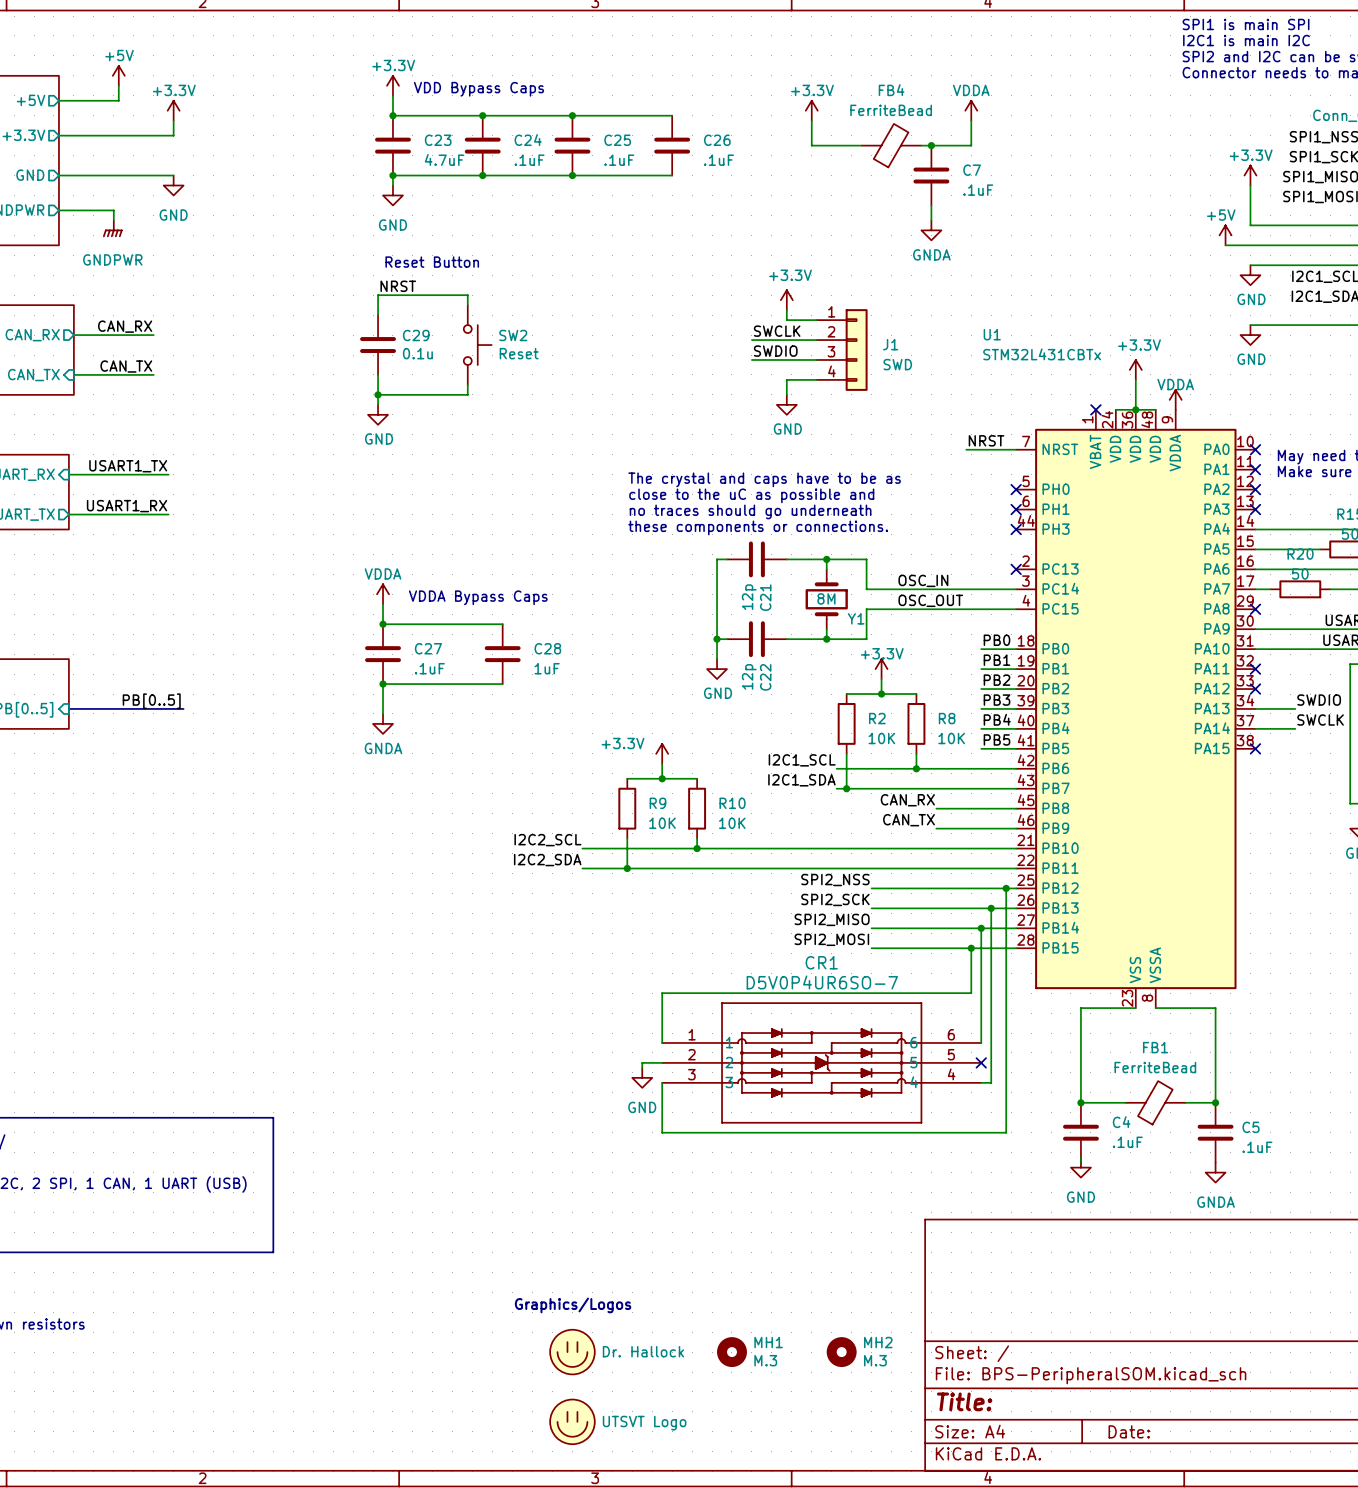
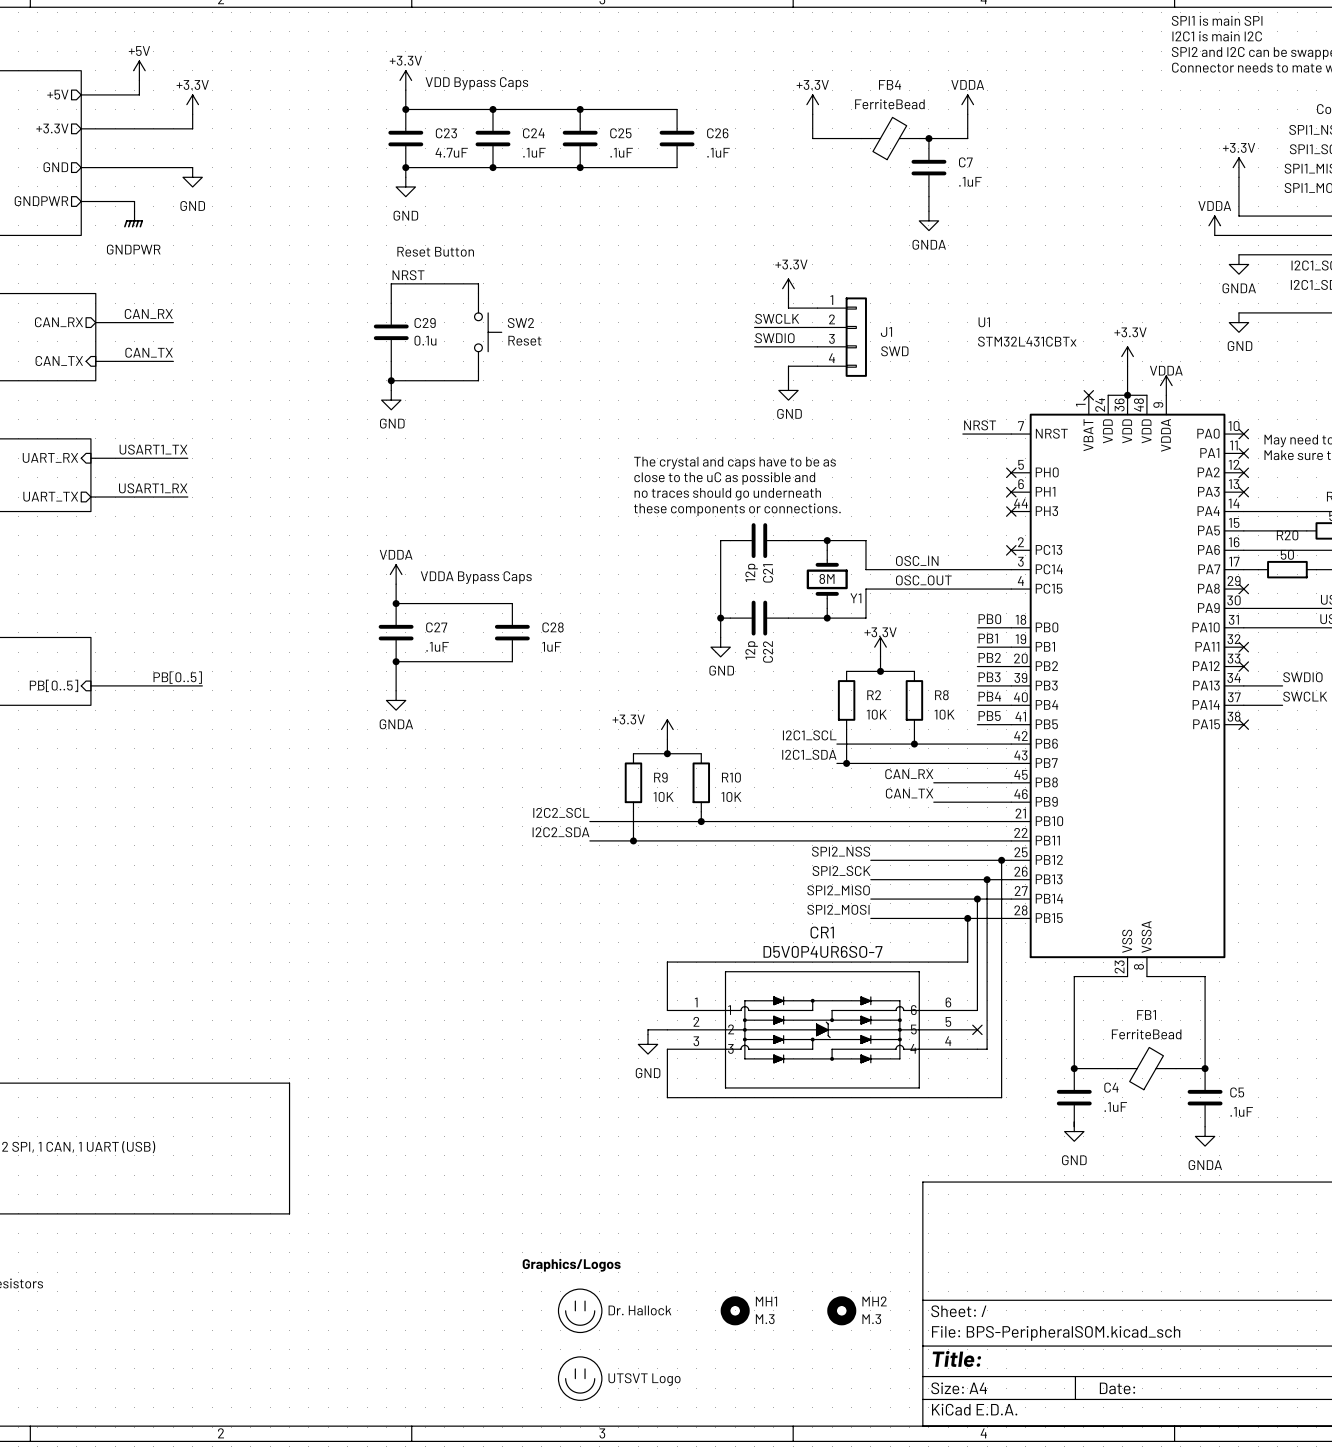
power symbol: +5V (1225, 235) -> VDDA (1214, 225)
power symbol: GND (1250, 275) -> GNDA (1238, 264)

